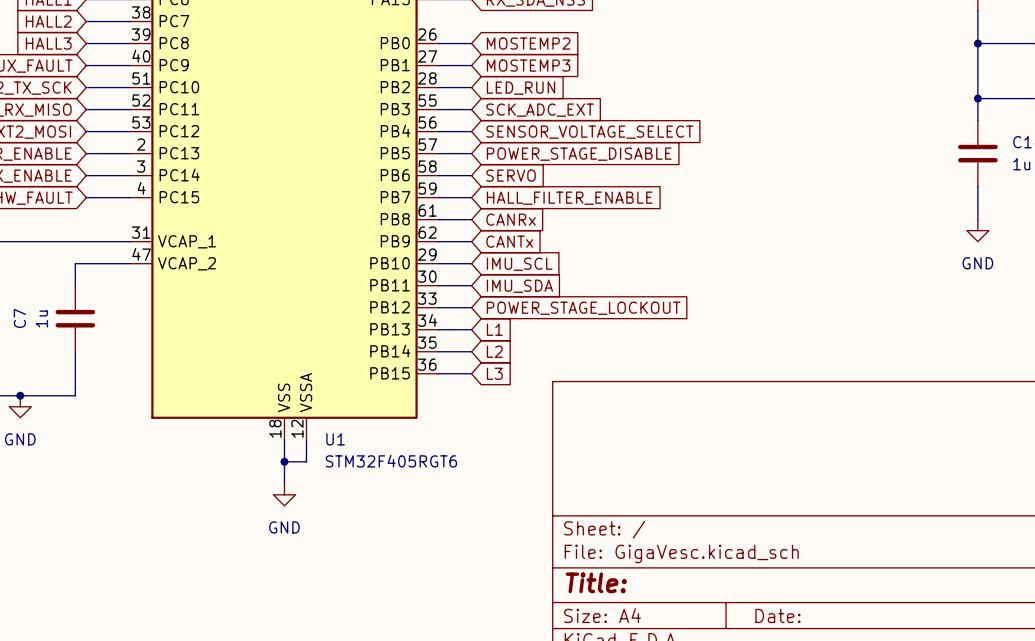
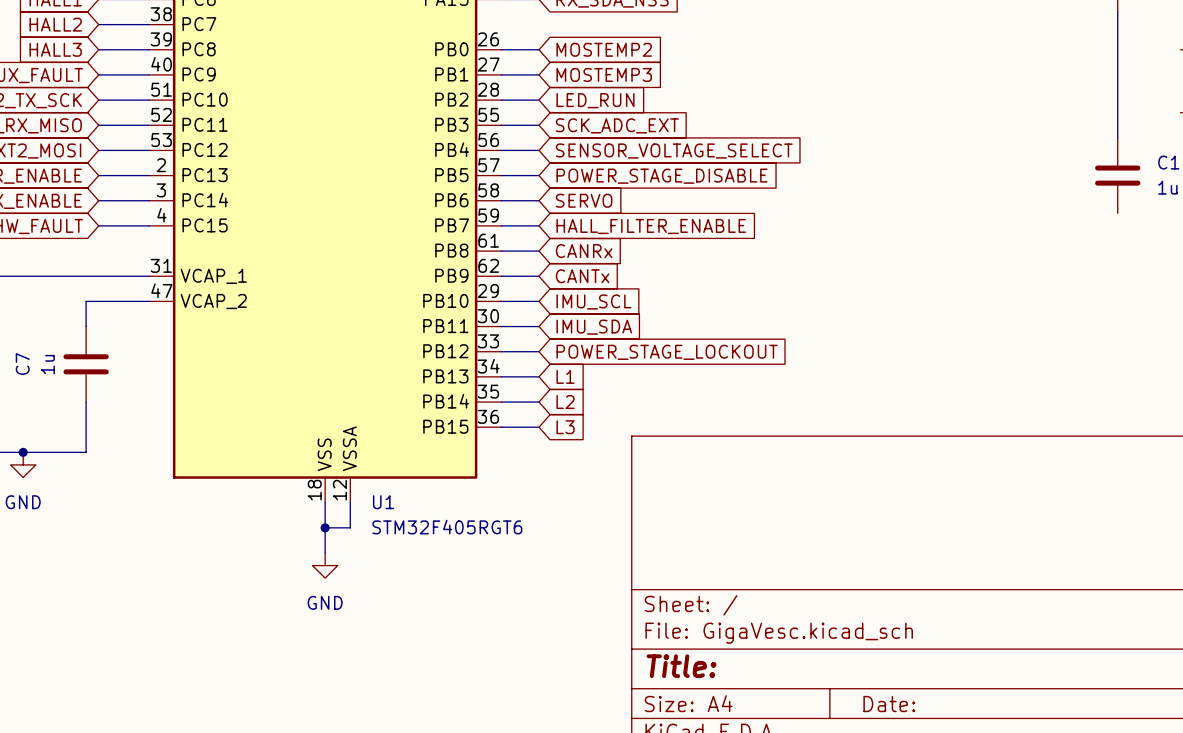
wire: (977, 43) (1032, 43) -> none
junction: (977, 43) -> none
wire: (977, 98) (1032, 98) -> none
junction: (977, 98) -> none
wire: (977, 186) (977, 219) -> none
power symbol: GND (977, 230) -> none

